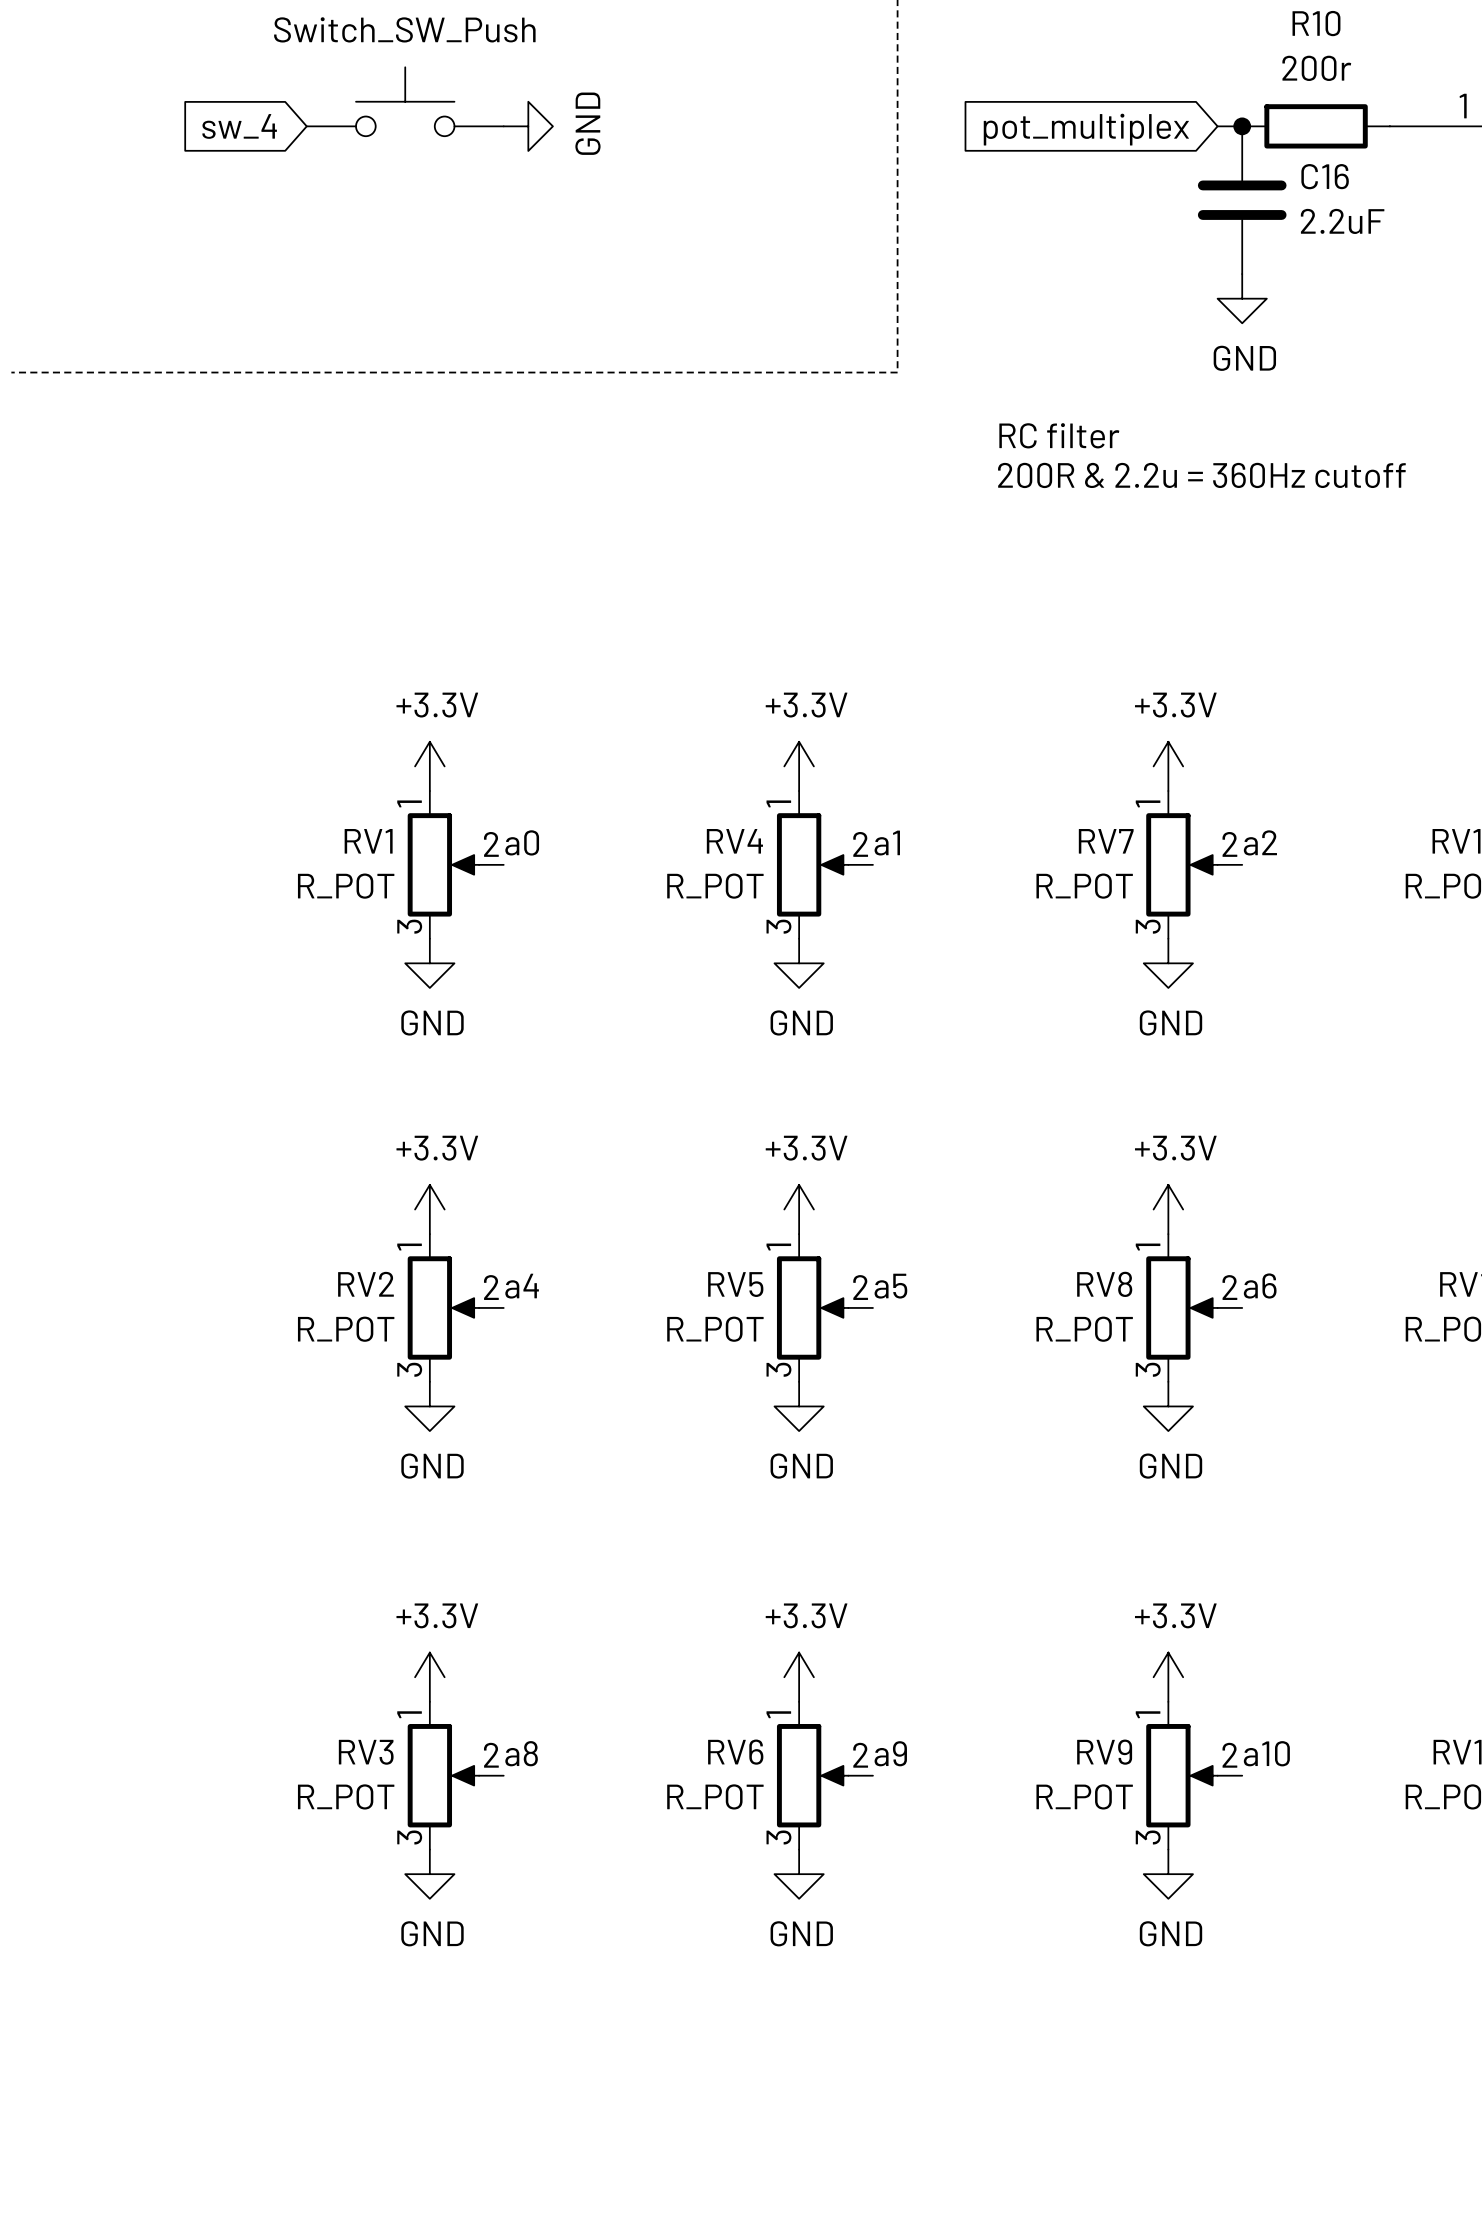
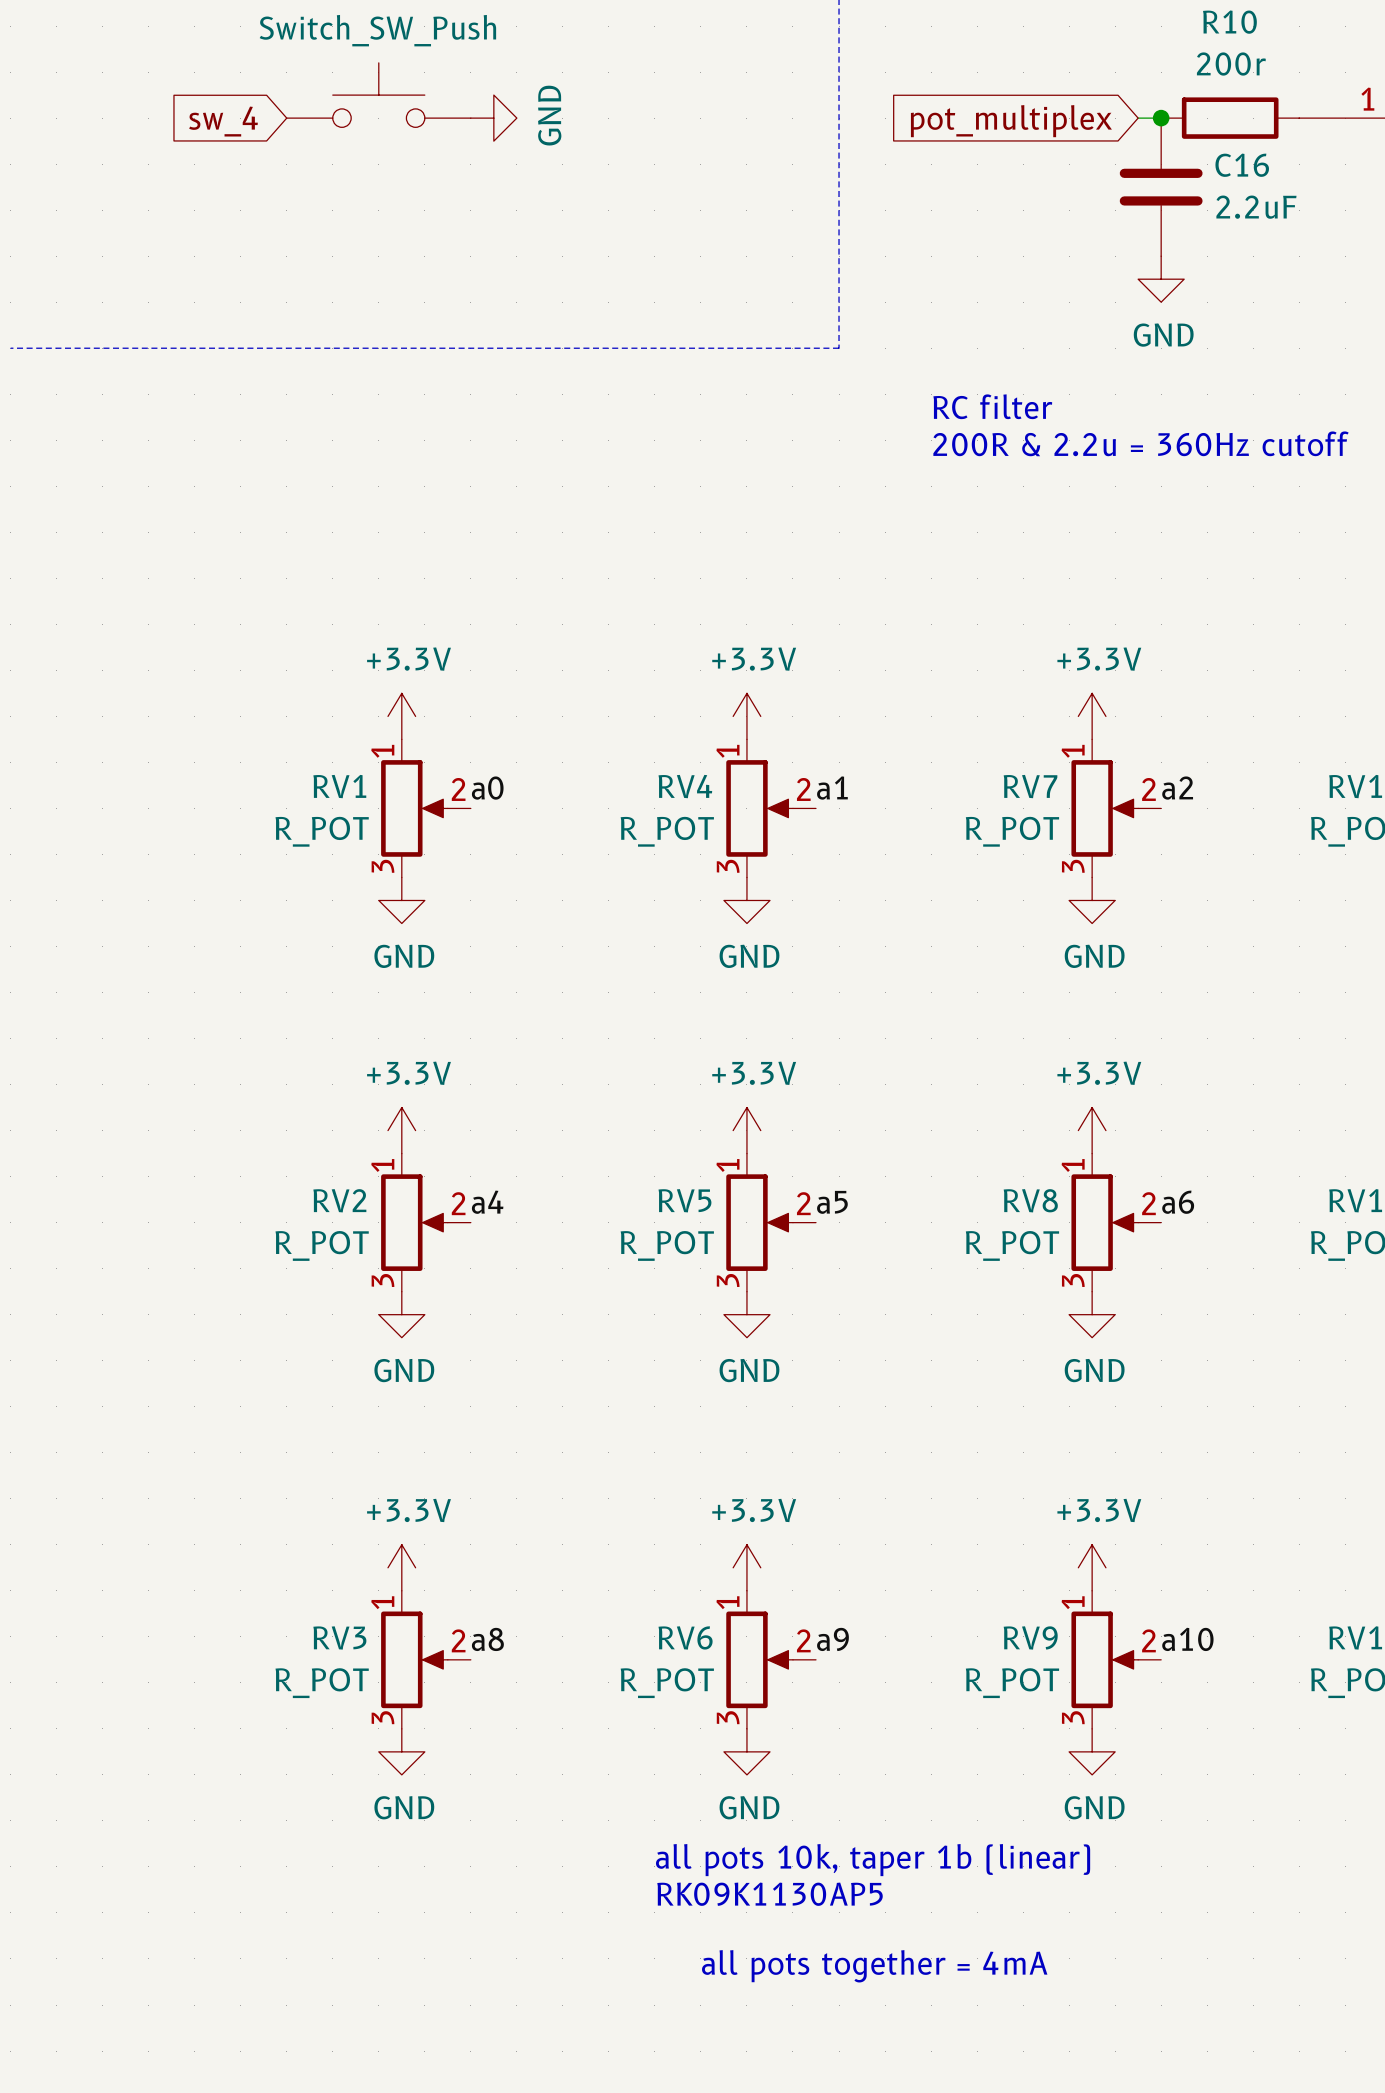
text: none -> all pots 10k, taper 1b (linear) (873, 1860)
text: none -> RK09K1130AP5 (770, 1894)
text: none -> all pots together = 4mA (874, 1966)

